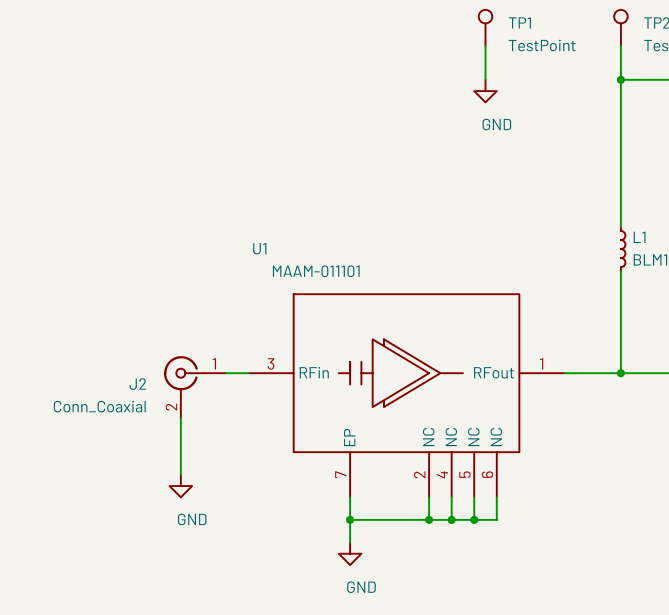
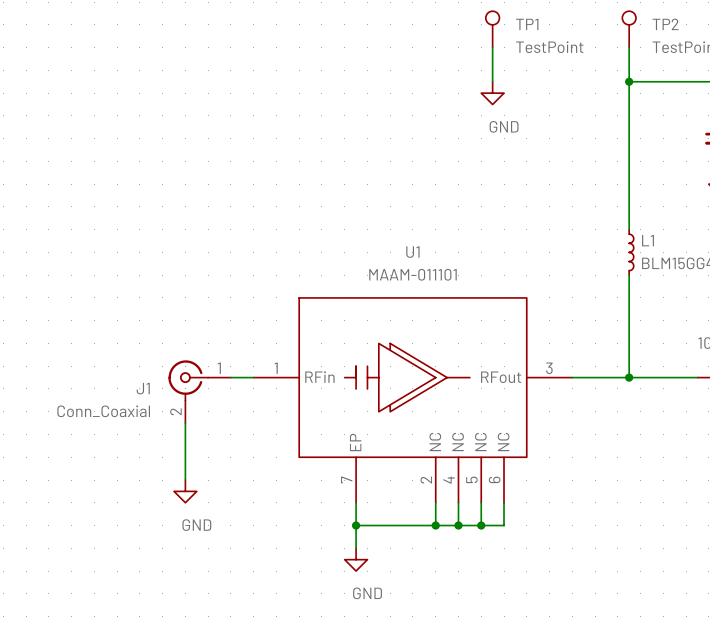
U1 name position: U1 (259, 248) -> U1 (412, 252)
U1 value position: MAAM-011101 (316, 271) -> MAAM-011101 (412, 274)
U1 pin number: 3 (270, 363) -> 1 (276, 368)
U1 pin number: 1 (541, 363) -> 3 (549, 368)
J2 name: J2 (137, 384) -> J1 (143, 388)

